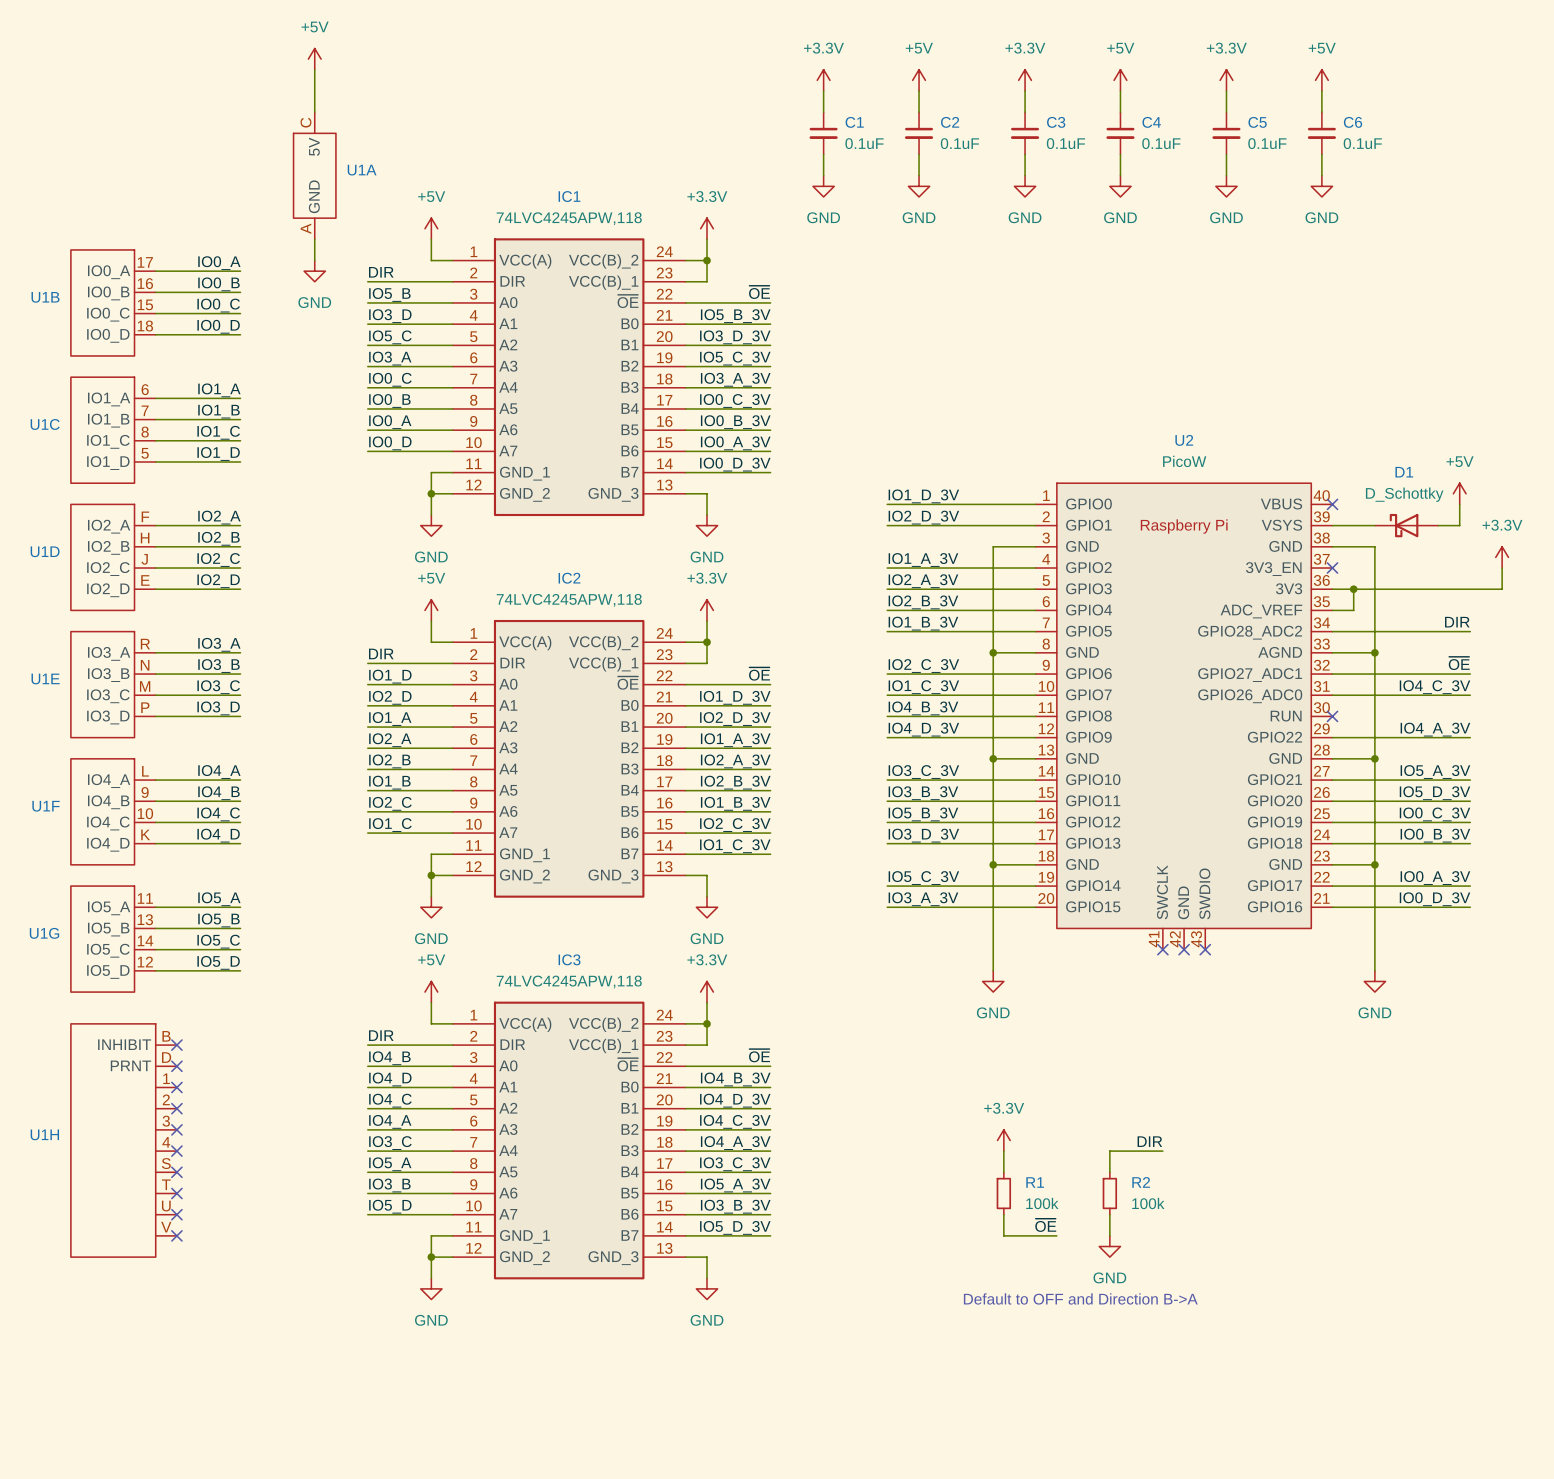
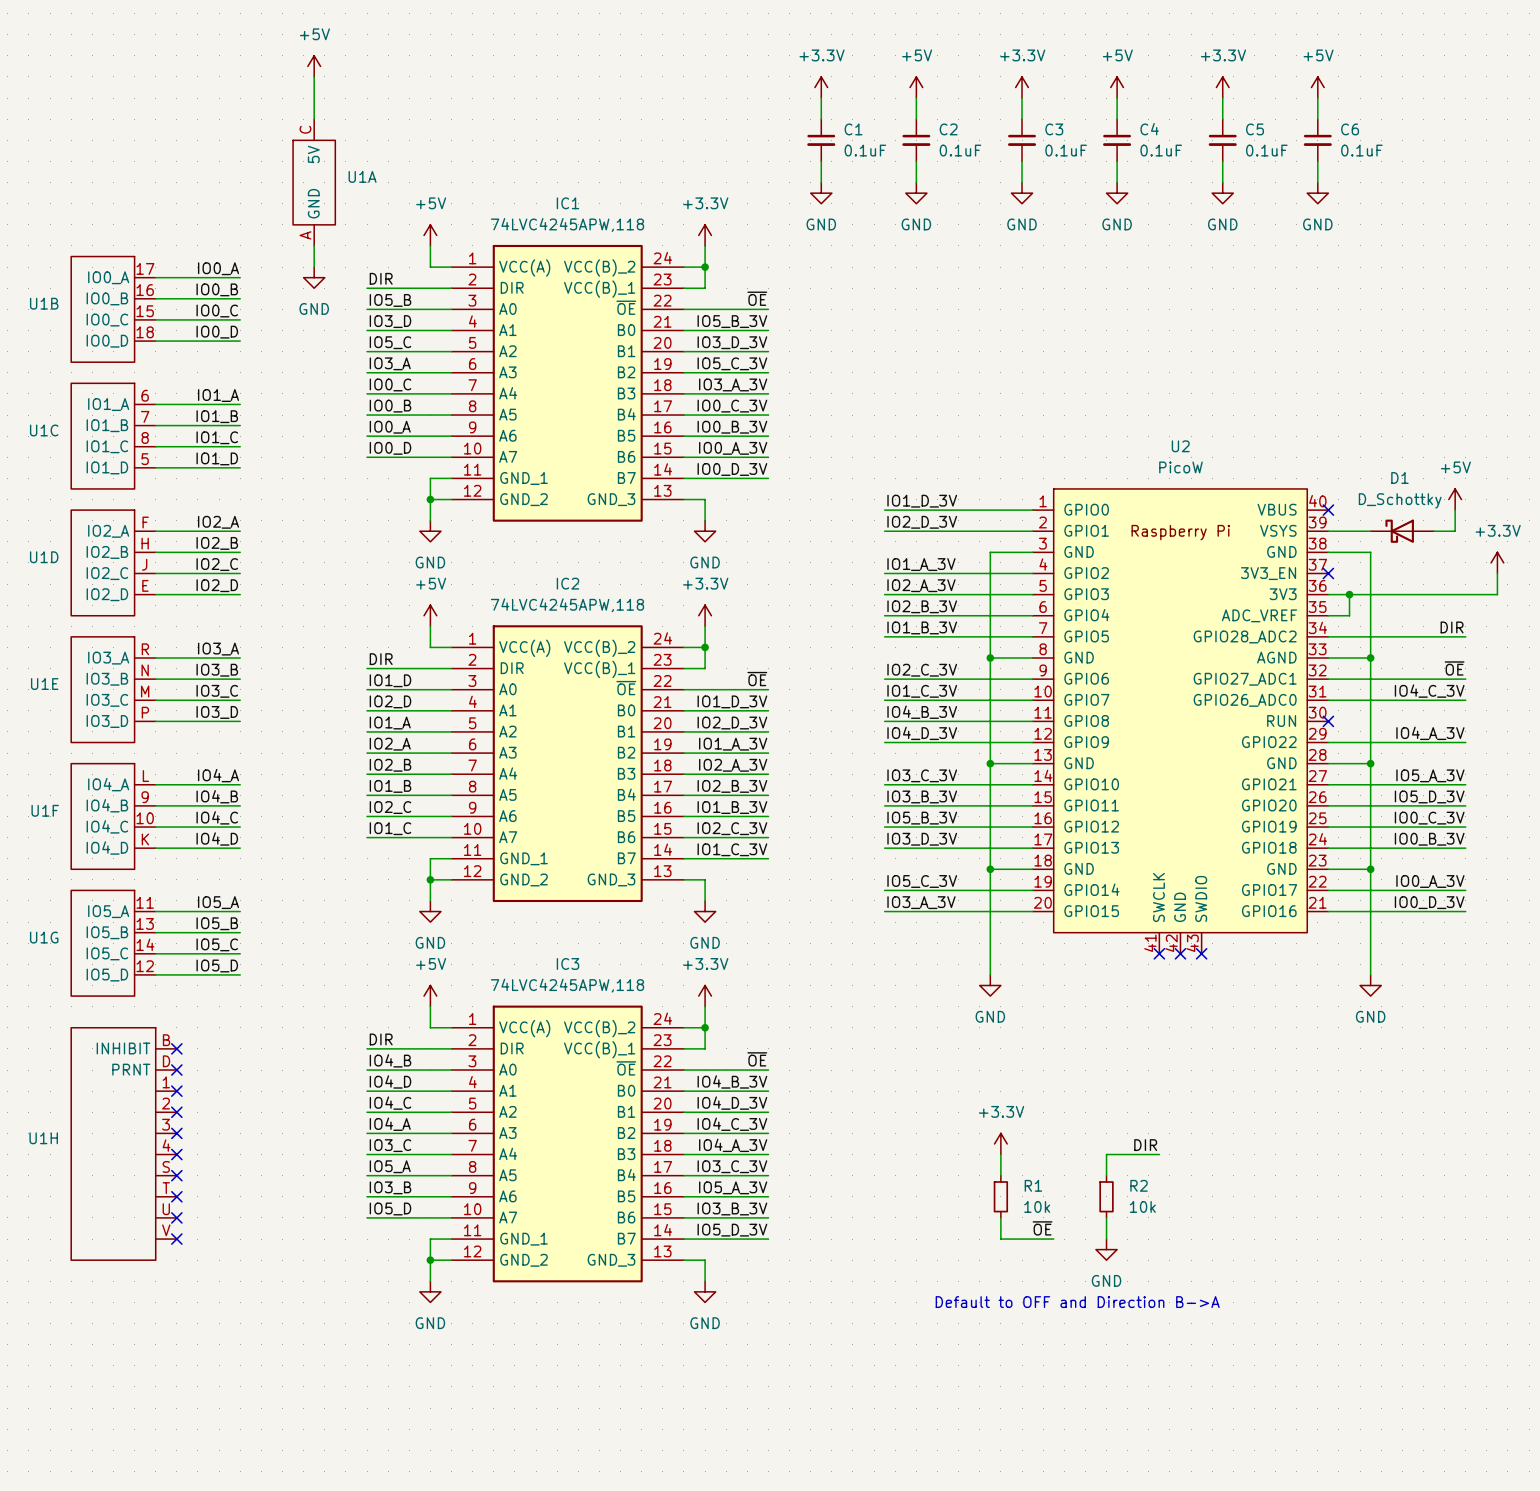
R1 value: 100k (1042, 1203) -> 10k (1037, 1206)
R2 value: 100k (1148, 1203) -> 10k (1142, 1206)

